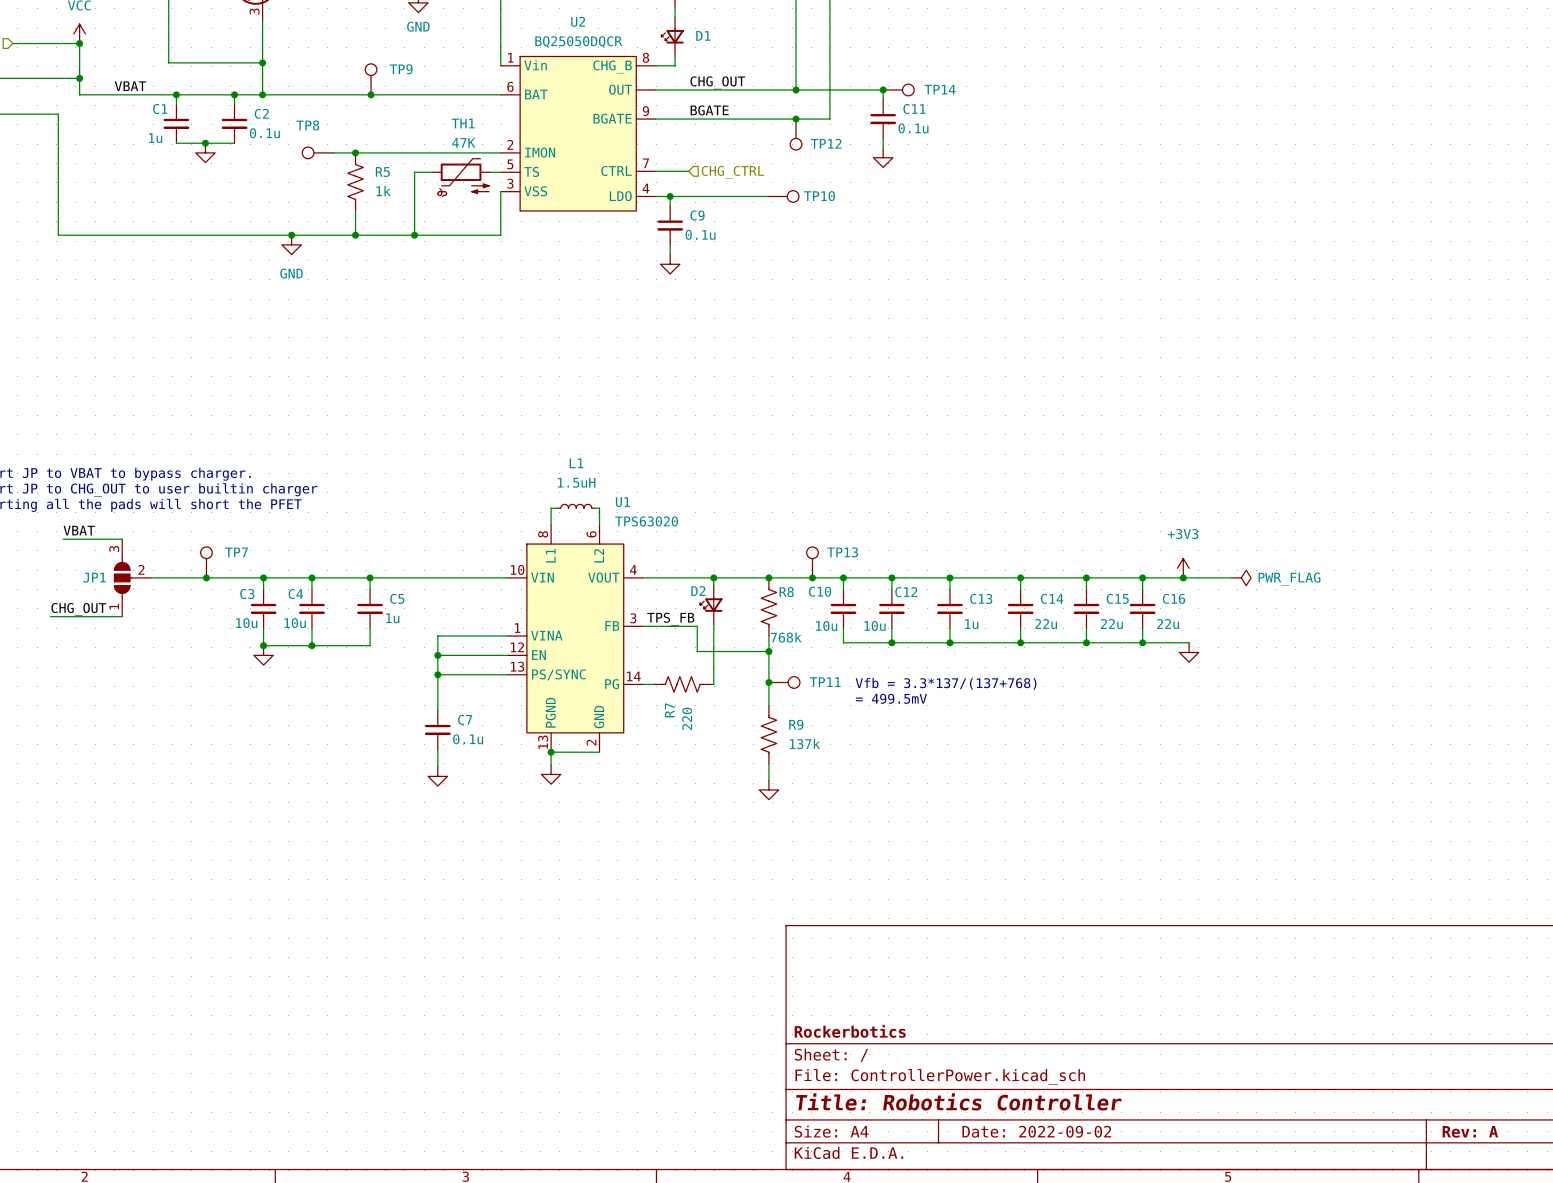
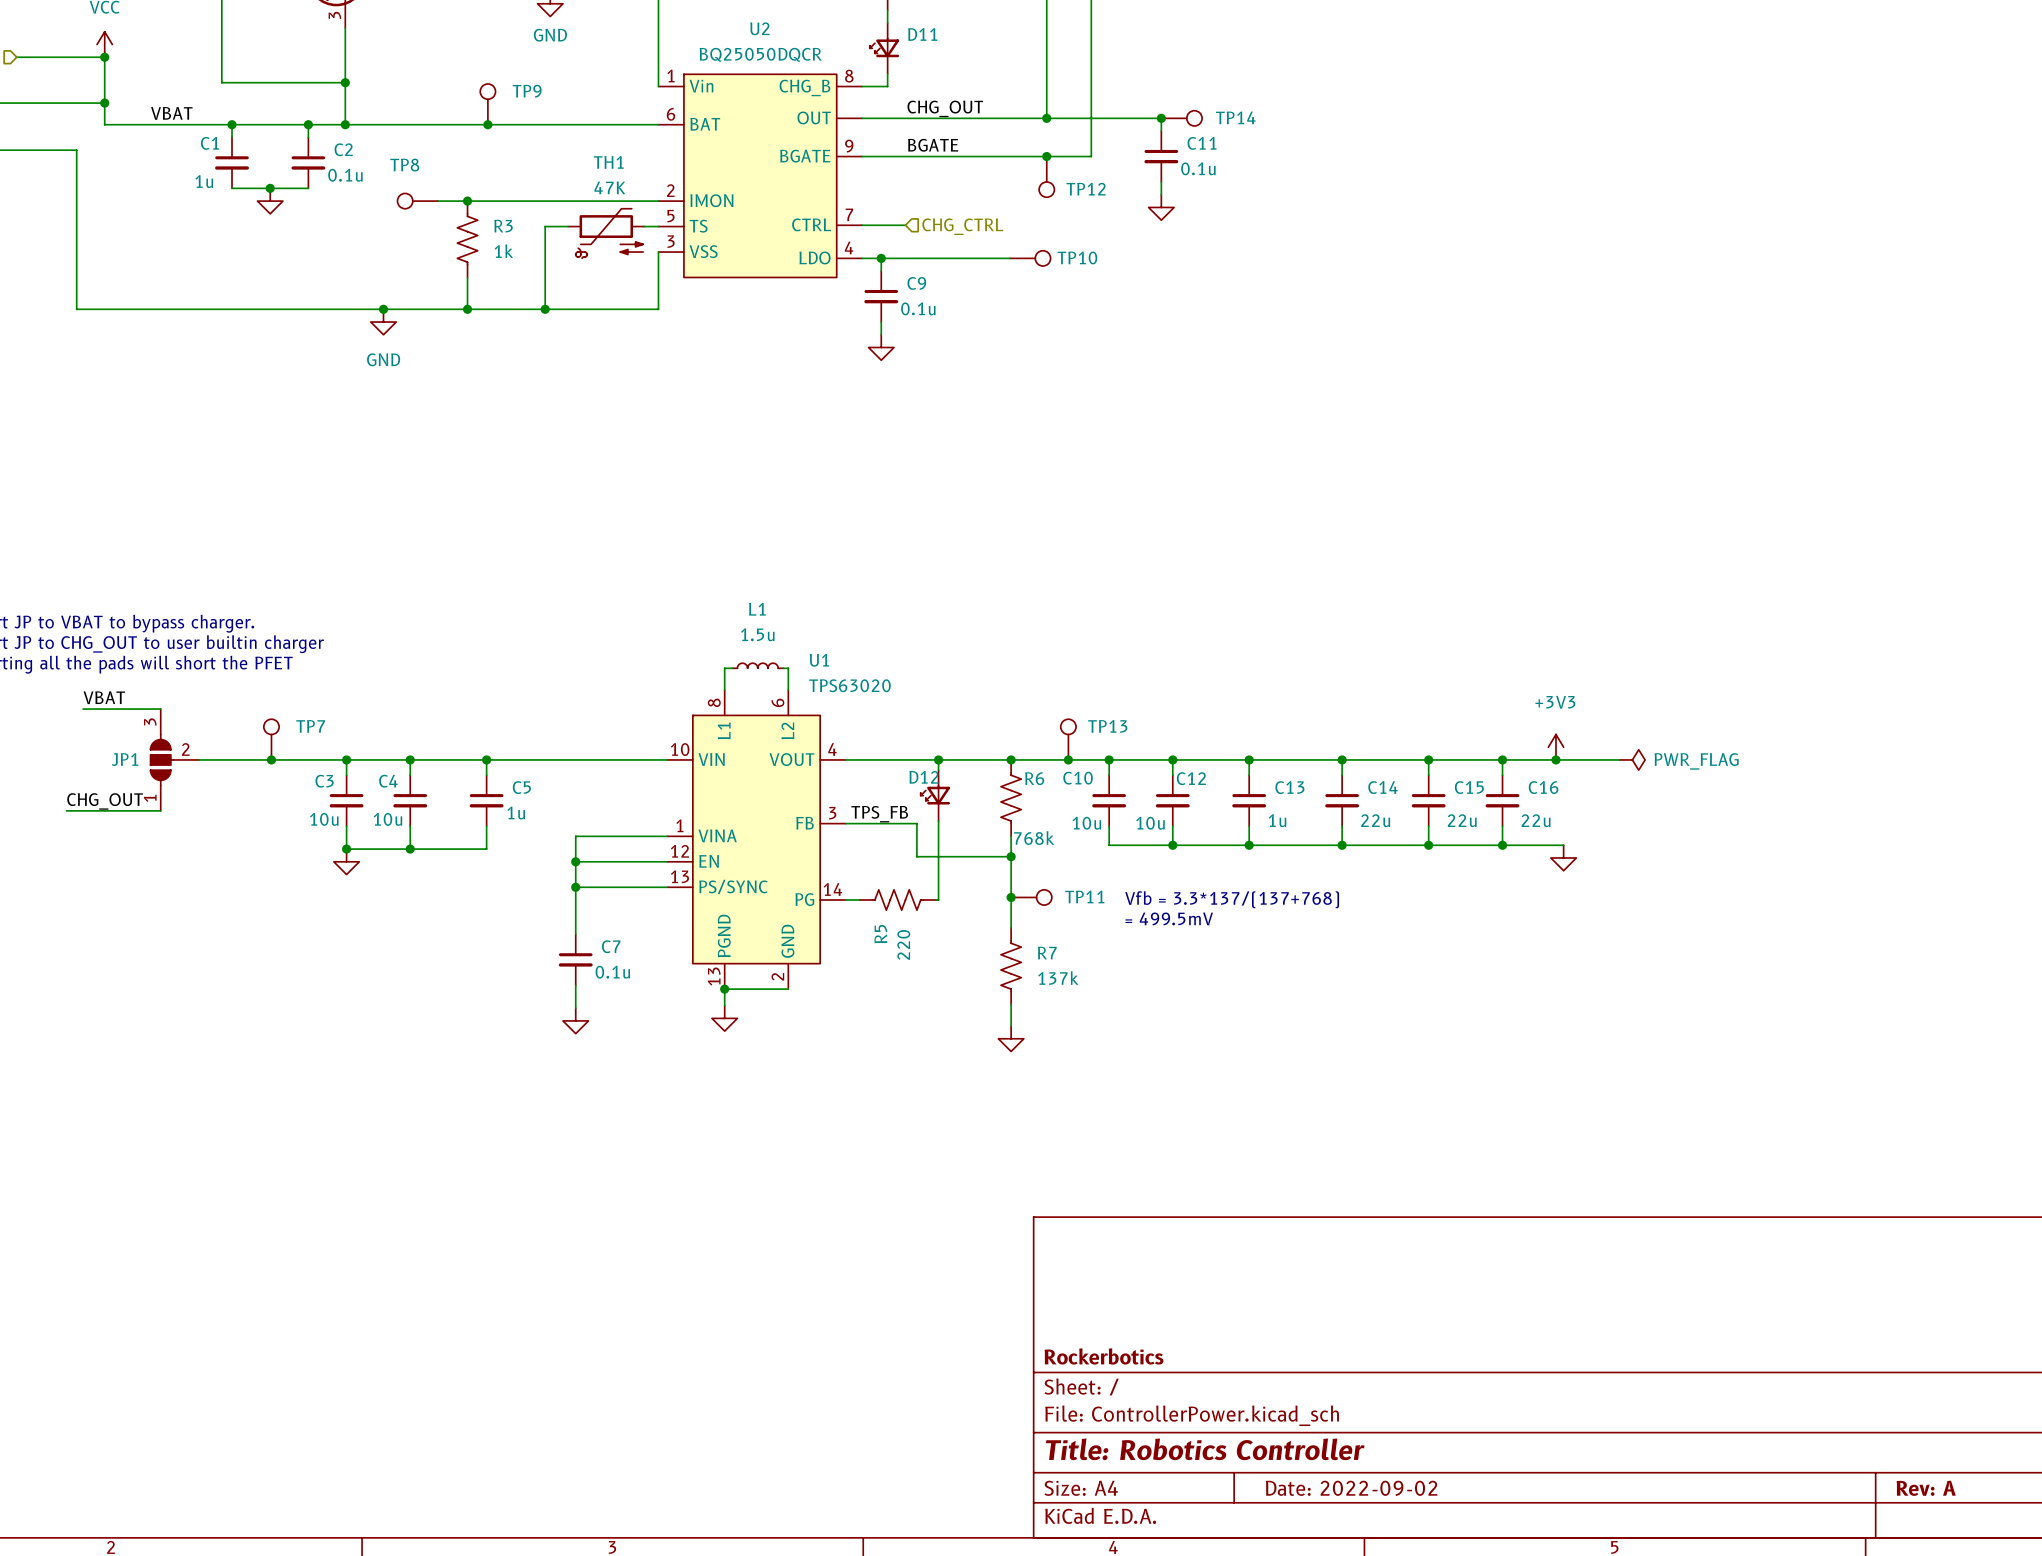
D1 name: D1 (703, 35) -> D11 (922, 34)
R5 name: R5 (382, 172) -> R3 (503, 226)
L1 value: 1.5uH (576, 482) -> 1.5u (757, 634)
D2 name: D2 (698, 591) -> D12 (924, 777)
R8 name: R8 (786, 592) -> R6 (1034, 778)
R7 name: R7 (669, 710) -> R5 (880, 934)
R9 name: R9 (796, 724) -> R7 (1047, 953)

